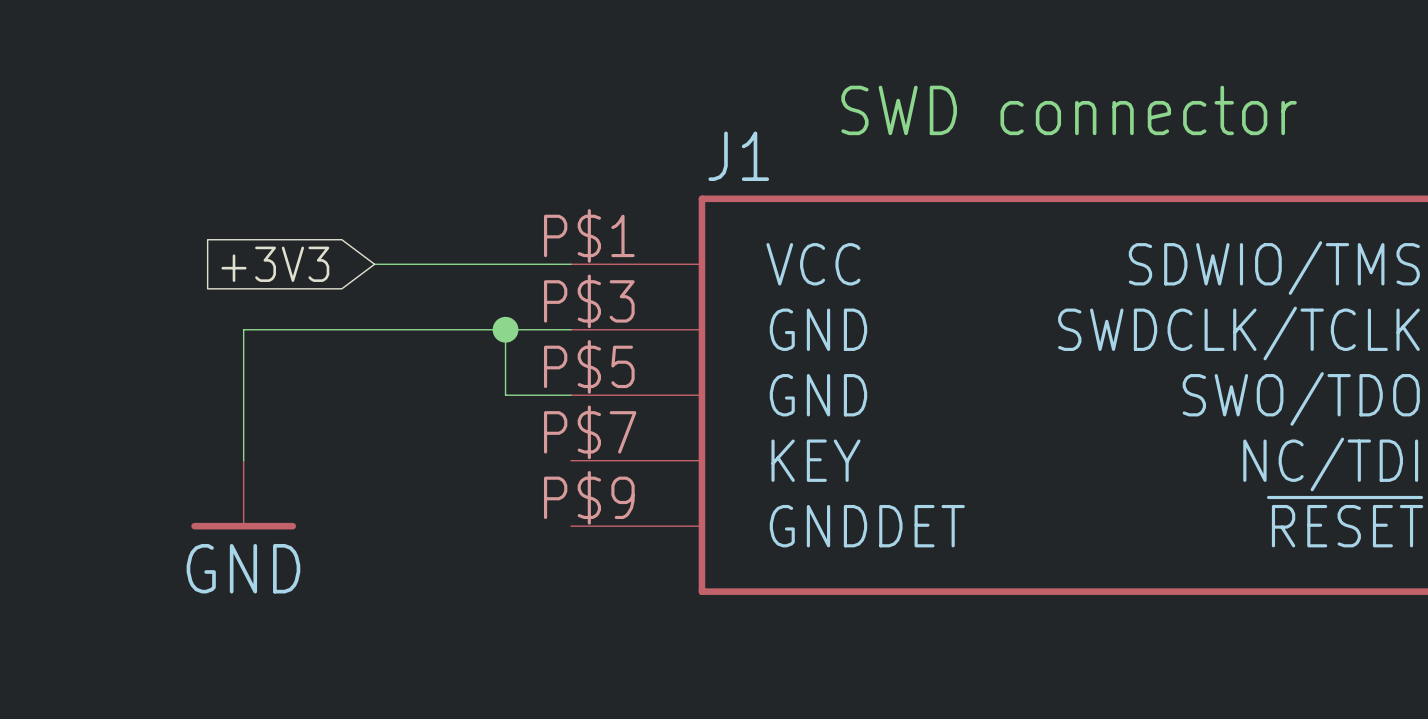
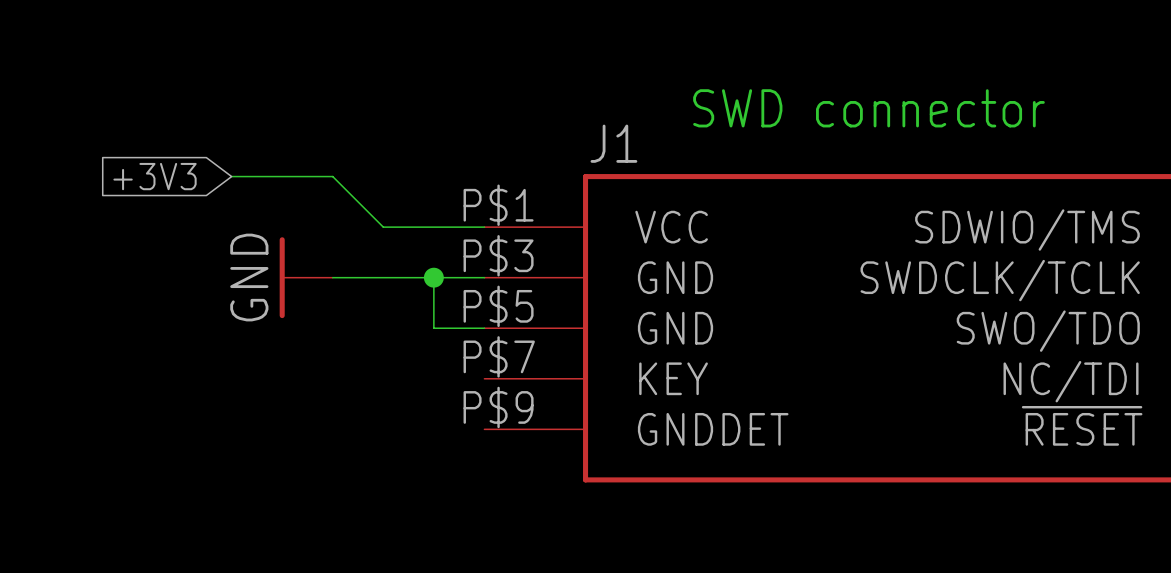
global label position: +3V3 (275, 264) -> +3V3 (155, 176)
wire: (374, 264) (440, 264) -> (231, 176) (332, 176) (383, 227)
wire: (374, 329) (243, 329) (243, 460) -> none
power symbol position: GND (243, 495) -> GND (306, 277)
power symbol rotation: 0° (243, 526) -> 90° clockwise (282, 277)

